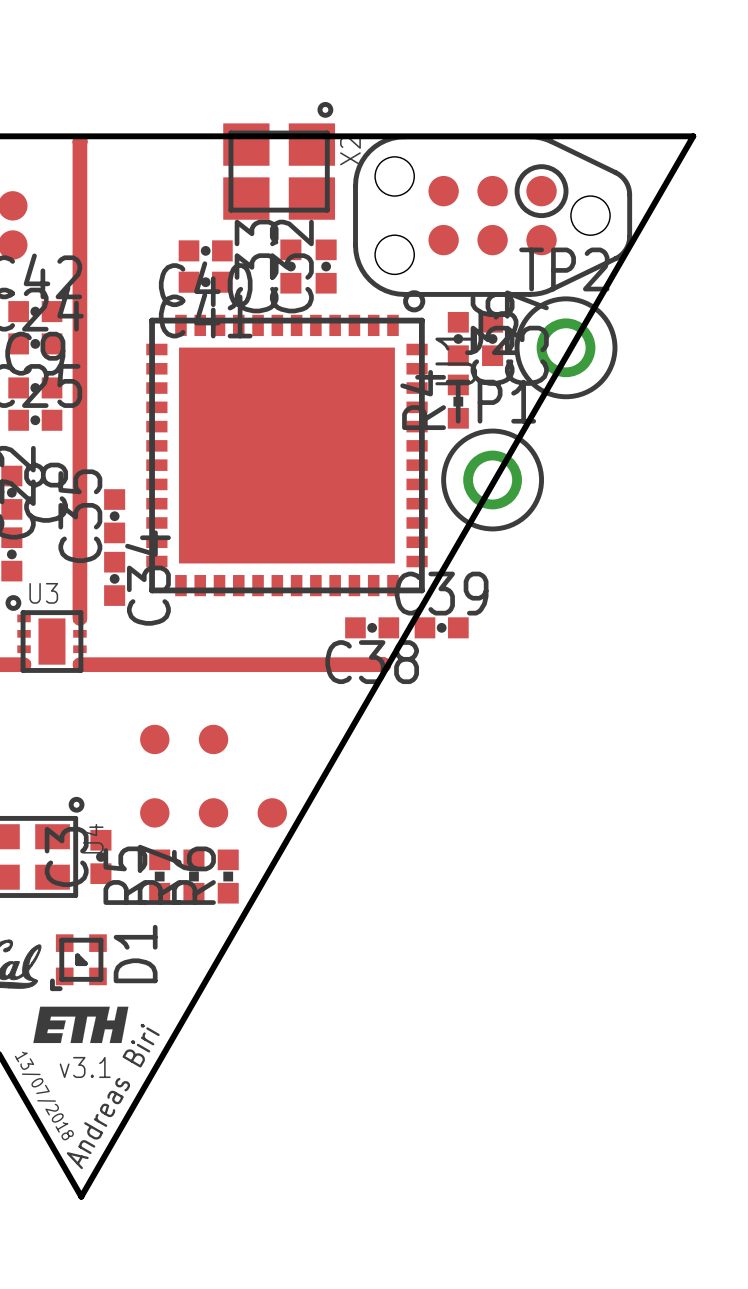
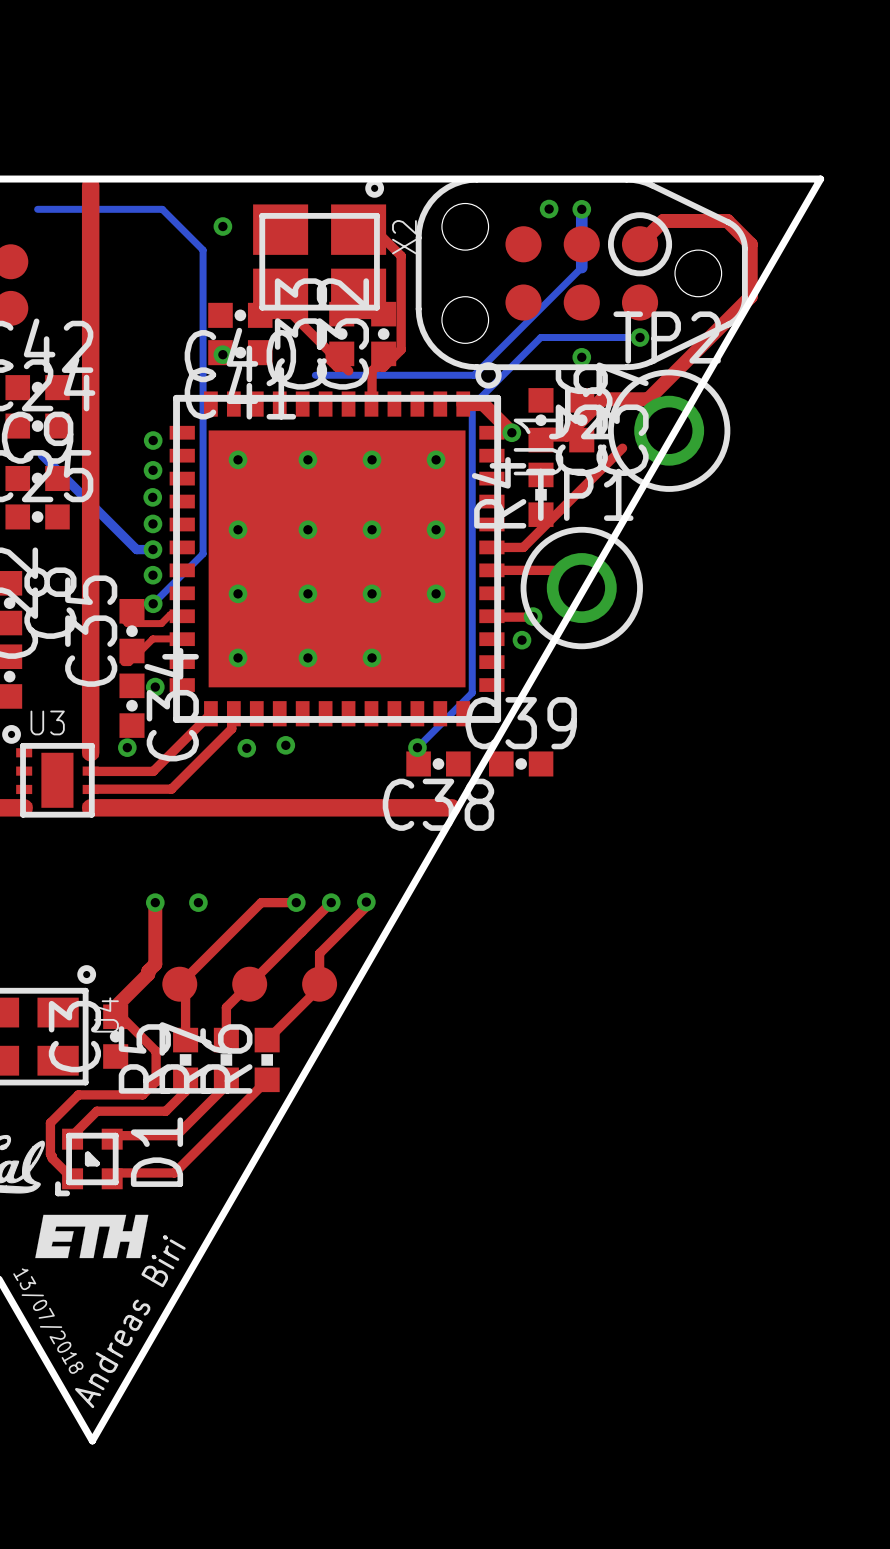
X2 position: (279, 160) -> (319, 249)
bottom track: none -> (37, 209) (162, 209) (203, 250) (203, 553) (153, 603)
via: none -> (549, 209)
bottom track: none -> (581, 209) (581, 267) (474, 375) (315, 375)
via: none -> (581, 209)
via: none -> (222, 226)
top track: none -> (358, 229) (374, 229) (401, 255) (401, 349) (383, 367) (375, 367) (372, 370) (372, 403)
top track: none -> (640, 244) (663, 220) (727, 220) (750, 244) (750, 296) (648, 399) (602, 399) (566, 434) (542, 434)
top track: none -> (280, 293) (280, 302) (330, 352) (330, 360) (337, 367) (345, 367) (348, 370)
bottom track: none -> (640, 337) (540, 337) (472, 406) (472, 692) (417, 747)
via: none -> (640, 337)
via: none -> (222, 354)
via: none -> (581, 357)
top track: none -> (463, 404) (483, 404) (511, 432)
via: none -> (511, 432)
via: none -> (153, 440)
top track: none -> (622, 448) (523, 547) (491, 547)
bottom track: none -> (42, 455) (136, 549) (152, 549)
via: none -> (238, 459)
via: none -> (307, 459)
via: none -> (372, 459)
via: none -> (436, 459)
via: none -> (153, 470)
via: none -> (152, 497)
via: none -> (152, 523)
via: none -> (238, 529)
via: none -> (307, 529)
via: none -> (372, 529)
via: none -> (436, 529)
via: none -> (152, 549)
top track: none -> (587, 564) (581, 570) (491, 570)
via: none -> (152, 575)
via: none -> (238, 593)
via: none -> (307, 593)
via: none -> (372, 593)
via: none -> (436, 593)
via: none -> (153, 603)
top track: none -> (182, 616) (170, 614) (161, 623) (127, 623) (125, 621)
top track: none -> (491, 616) (532, 617)
via: none -> (533, 616)
top track: none -> (181, 638) (152, 638) (129, 662) (123, 662)
via: none -> (521, 640)
via: none -> (238, 657)
via: none -> (307, 657)
via: none -> (372, 657)
via: none -> (155, 687)
top track: none -> (210, 713) (153, 771) (90, 771)
top track: none -> (233, 713) (231, 715) (231, 728) (171, 789) (90, 789)
via: none -> (285, 745)
via: none -> (127, 747)
via: none -> (246, 748)
via: none -> (417, 747)
part: (154, 739) -> none
part: (213, 739) -> none
top track: none -> (366, 902) (366, 906) (319, 953) (319, 984) (323, 984) (267, 1040)
via: none -> (366, 902)
top track: none -> (155, 902) (155, 964) (148, 971) (148, 974) (115, 1006) (115, 1010) (156, 1051) (156, 1081) (142, 1094) (78, 1094) (50, 1122) (50, 1154) (72, 1178)
via: none -> (155, 902)
via: none -> (198, 902)
top track: none -> (296, 902) (261, 902) (179, 984) (185, 990) (185, 1040)
via: none -> (296, 902)
top track: none -> (331, 902) (226, 1007) (226, 1040)
via: none -> (331, 902)
top track: none -> (185, 1079) (185, 1091) (165, 1111) (96, 1111) (72, 1135) (72, 1139)
top track: none -> (226, 1079) (226, 1085) (176, 1135) (115, 1135) (112, 1139)
top track: none -> (267, 1080) (174, 1172) (118, 1172) (112, 1178)
text: v3.1 (85, 1067) -> none

